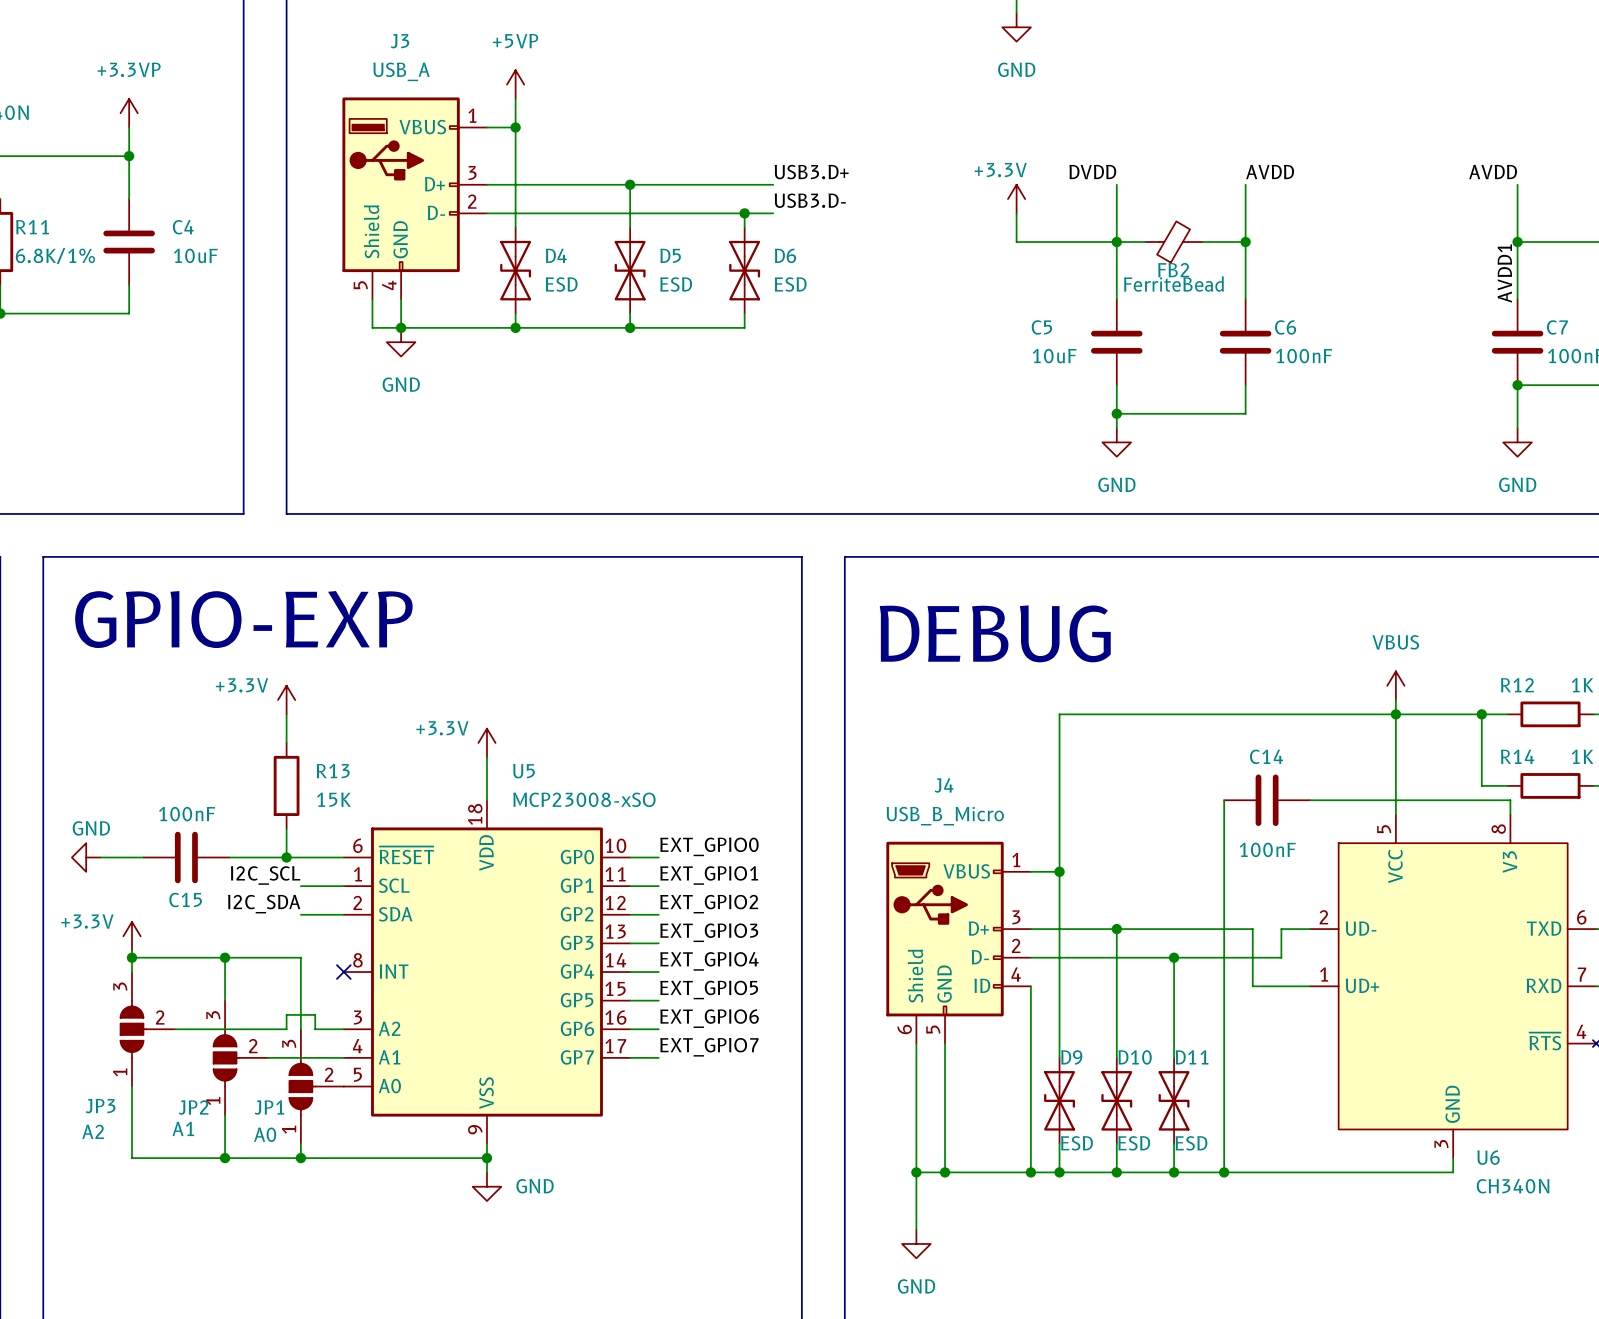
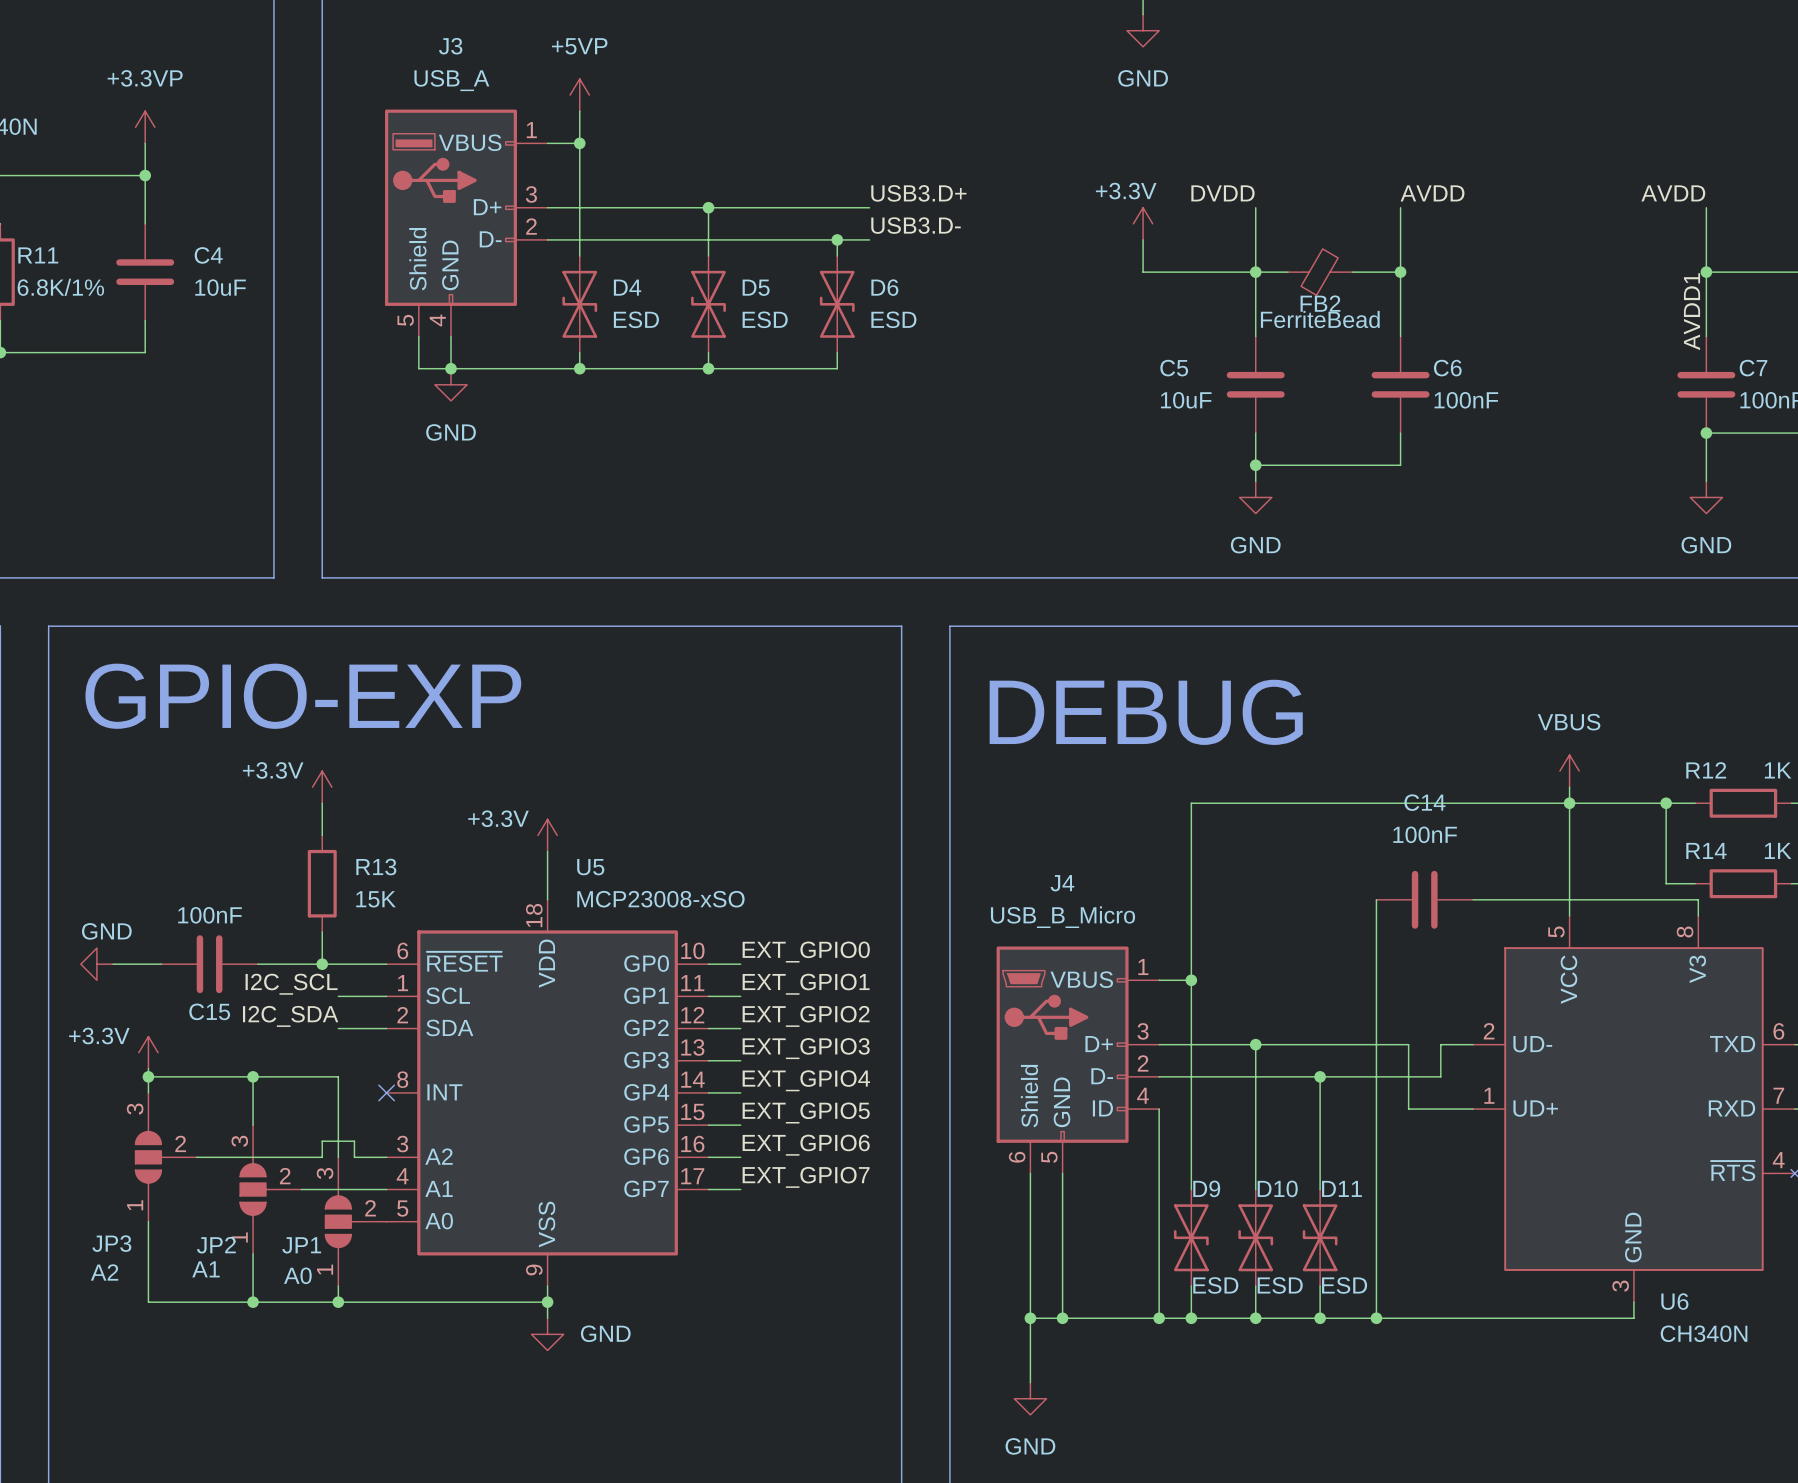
C14 name position: C14 (1266, 756) -> C14 (1424, 802)
C14 value position: 100nF (1267, 849) -> 100nF (1425, 834)

